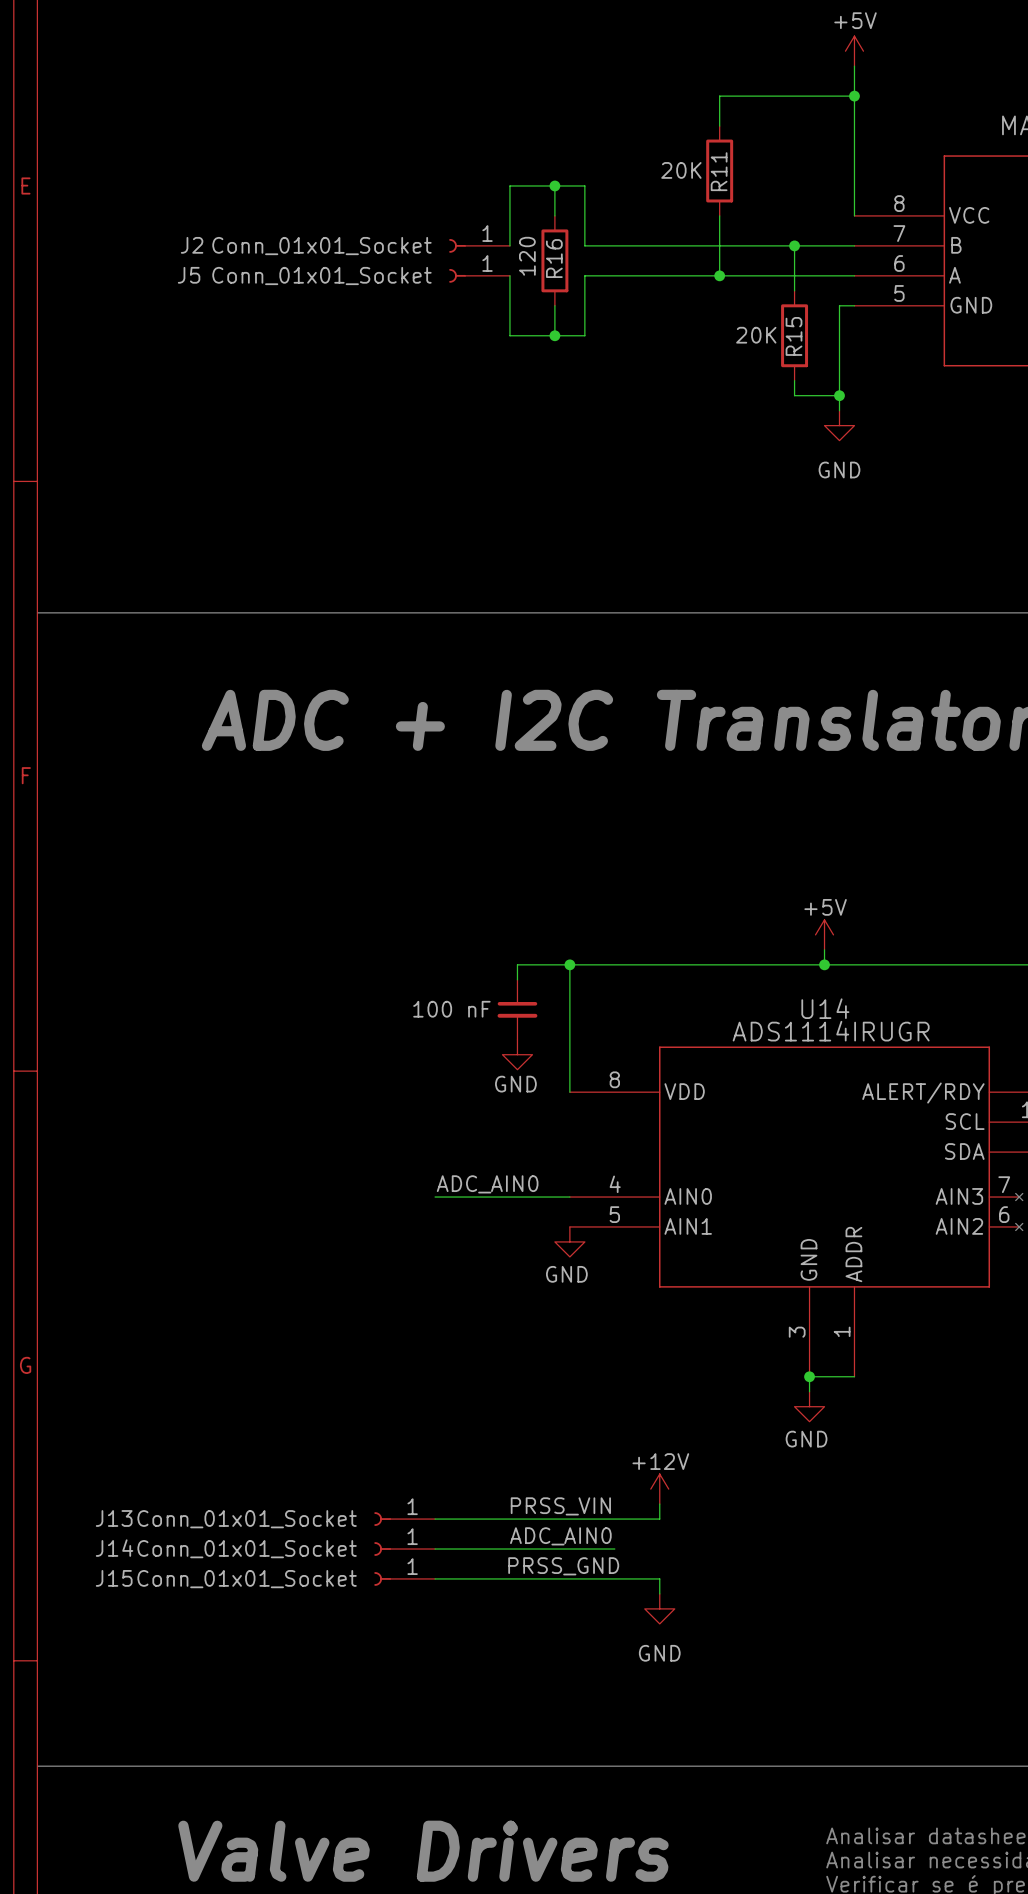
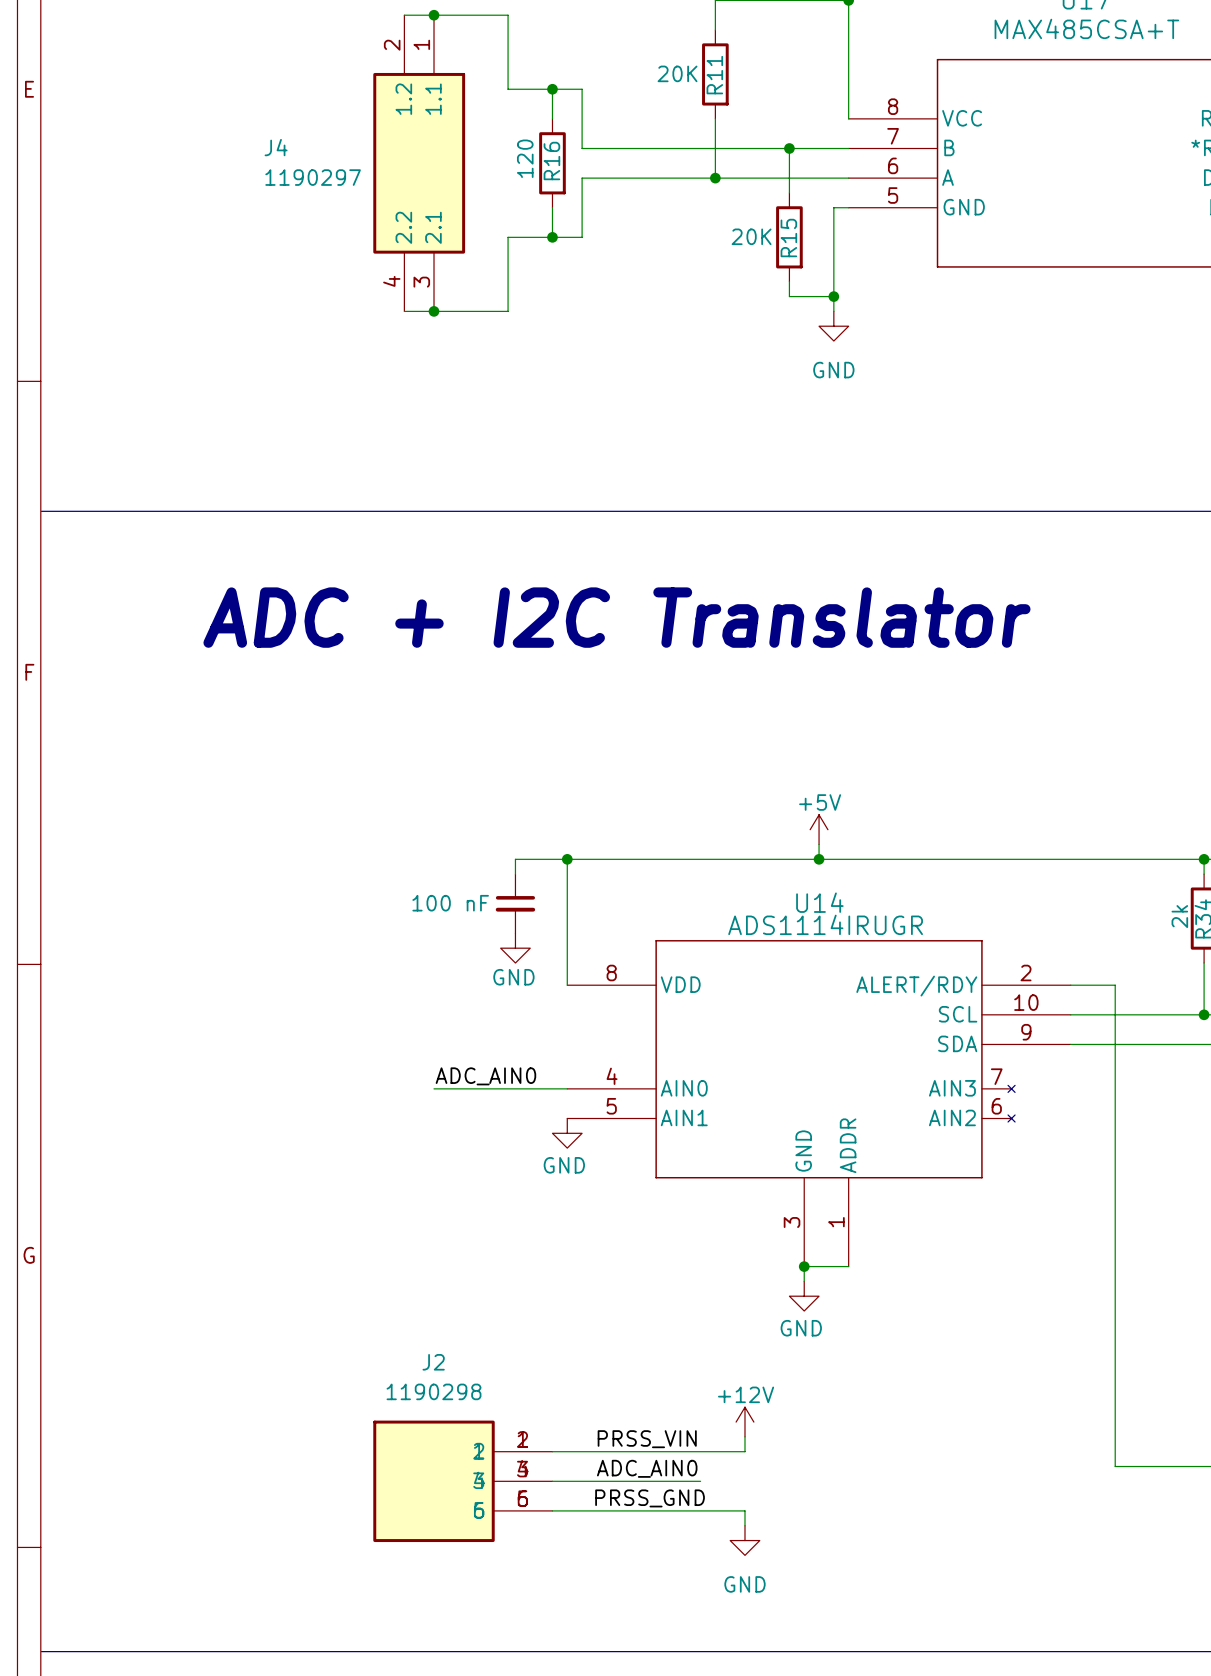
junction: none -> (434, 15)
wire: (509, 185) (509, 245) -> (508, 89) (508, 15) (404, 15)
J2 symbol: [449, 239, 510, 253] -> [373, 1420, 553, 1543]
J2 name position: J2 (192, 245) -> J2 (433, 1362)
J2 value: Conn_01x01_Socket (321, 246) -> 1190298 (434, 1391)
J4: none -> 1190297 (419, 163)
J5: Conn_01x01_Socket (479, 275) -> none
wire: (509, 275) (509, 335) -> (404, 311) (508, 311) (508, 237)
junction: none -> (434, 311)
power symbol position: +12V (659, 1489) -> +12V (744, 1422)
wire: (659, 1504) (659, 1519) (435, 1519) -> none
label position: PRSS_VIN (560, 1506) -> PRSS_VIN (647, 1439)
J13: Conn_01x01_Socket (404, 1519) -> none
label position: ADC_AIN0 (560, 1536) -> ADC_AIN0 (647, 1468)
J14: Conn_01x01_Socket (404, 1549) -> none
wire: (435, 1549) (614, 1549) -> none
wire: none -> (744, 1436) (744, 1451) (552, 1451)
label position: PRSS_GND (563, 1566) -> PRSS_GND (650, 1498)
J15: Conn_01x01_Socket (404, 1578) -> none
wire: (435, 1578) (659, 1578) (659, 1593) -> none
wire: none -> (552, 1481) (700, 1481)
power symbol position: GND (659, 1608) -> GND (744, 1540)
wire: none -> (552, 1510) (744, 1510) (744, 1525)

